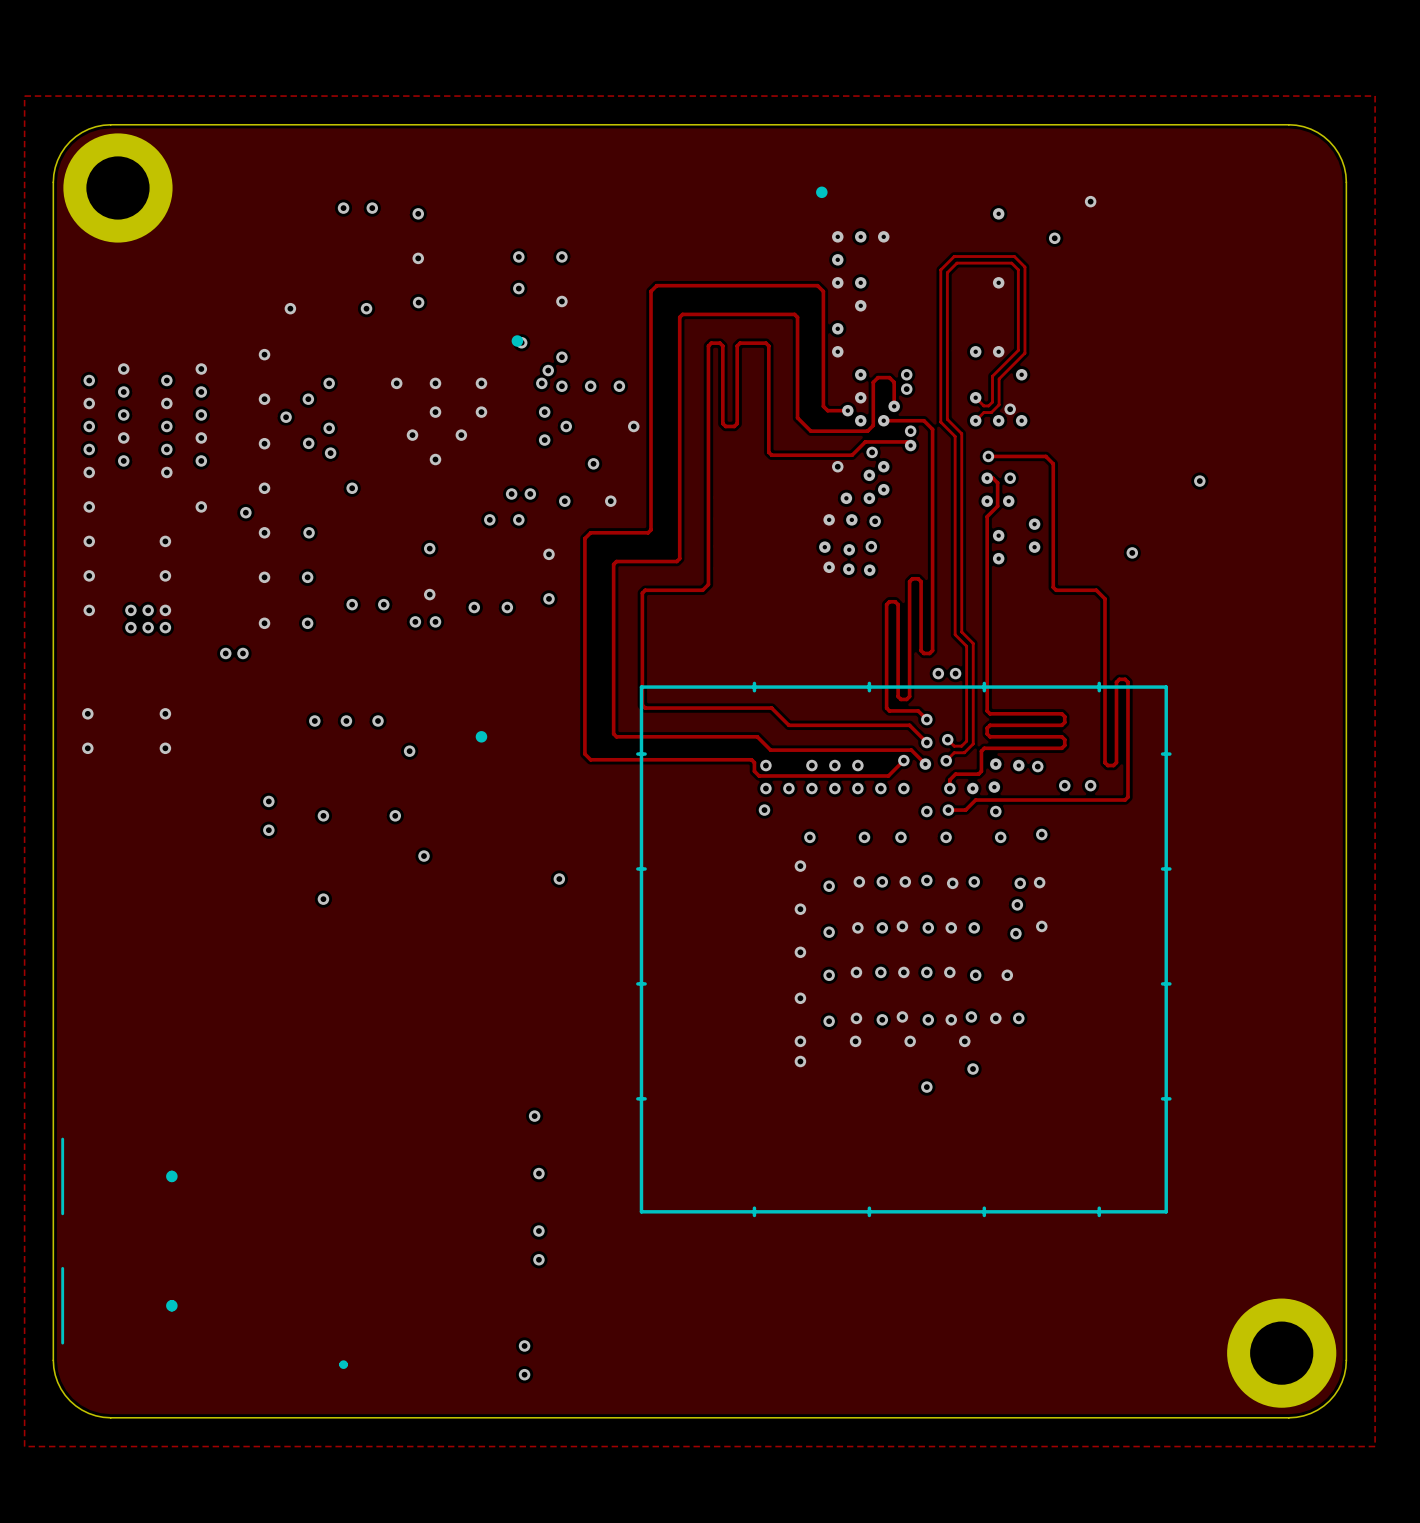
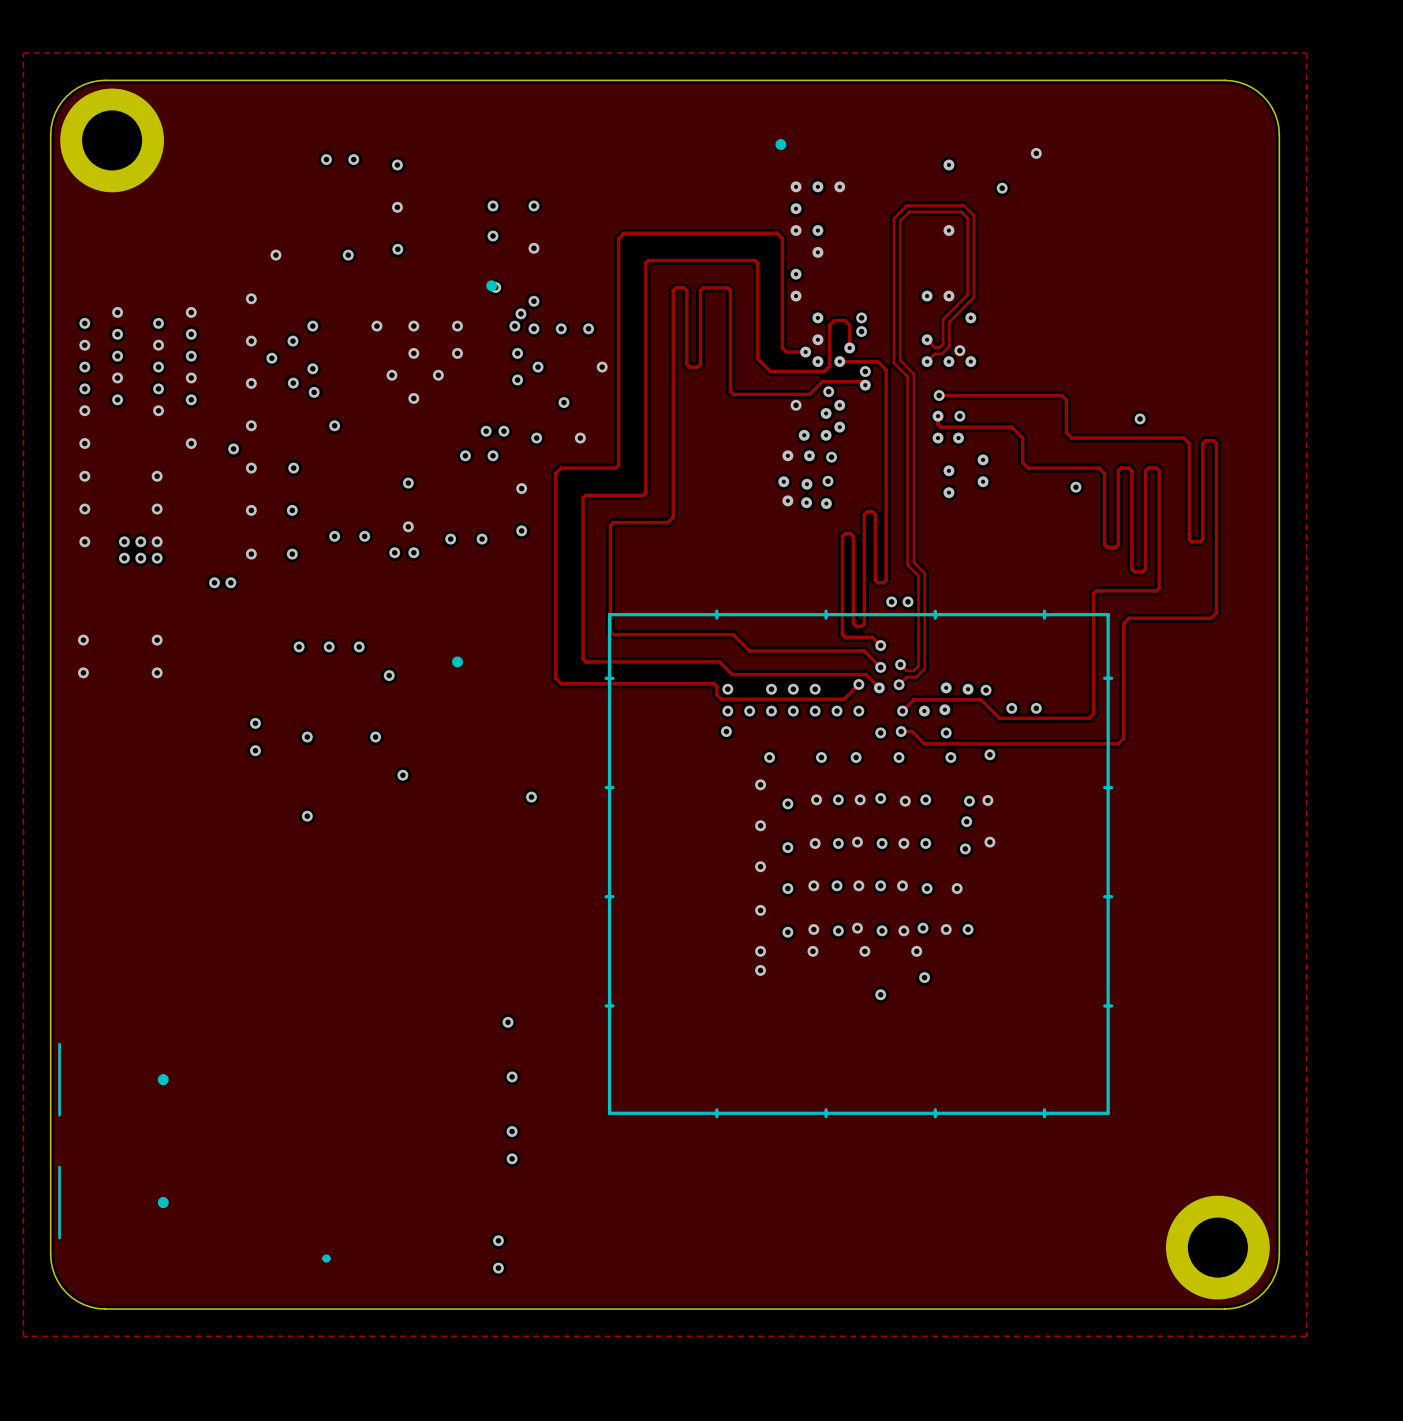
track: (1045, 456) (1053, 463) (1053, 587) (1056, 590) (1096, 590) (1104, 598) (1104, 762) (1107, 765) (1113, 765) (1116, 762) (1116, 682) (1119, 679) (1125, 679) (1127, 682) (1127, 797) (1125, 800) (975, 800) (965, 810) (959, 810) -> (993, 395) (1062, 395) (1066, 399) (1066, 432) (1071, 438) (1183, 438) (1189, 443) (1189, 539) (1191, 541) (1200, 541) (1202, 539) (1202, 443) (1205, 440) (1213, 440) (1216, 443) (1216, 612) (1211, 618) (1129, 618) (1123, 623) (1123, 738) (1118, 743) (924, 743) (912, 731)
track: (987, 478) (992, 478) (997, 482) (997, 506) (987, 516) (987, 710) (990, 713) (1061, 713) (1064, 716) (1064, 722) (1061, 725) (990, 725) (987, 728) (987, 733) (990, 736) (1061, 736) (1064, 739) (1064, 745) (1061, 748) (984, 748) (981, 751) (981, 771) (978, 774) (955, 774) (949, 779) (949, 788) -> (938, 416) (938, 424) (940, 427) (1011, 427) (1022, 438) (1022, 462) (1028, 468) (1099, 468) (1104, 473) (1104, 544) (1107, 547) (1115, 547) (1118, 544) (1118, 470) (1120, 468) (1129, 468) (1131, 470) (1131, 569) (1134, 571) (1142, 571) (1145, 569) (1145, 470) (1148, 468) (1156, 468) (1159, 470) (1159, 588) (1156, 590) (1096, 590) (1093, 593) (1093, 713) (1089, 718) (999, 718) (980, 699) (913, 699) (902, 711)

